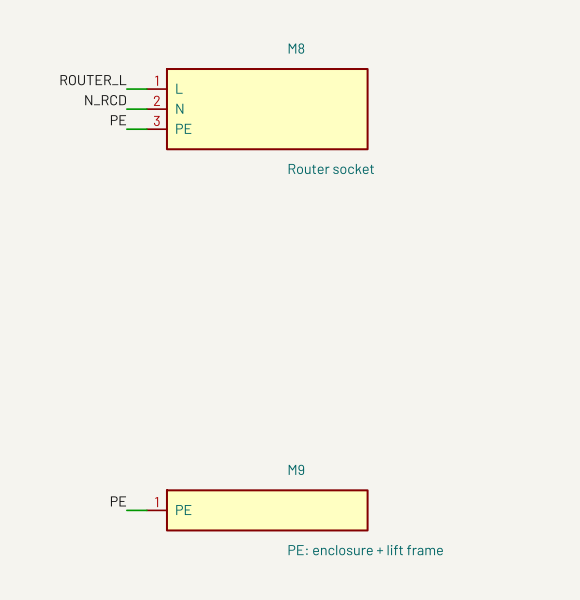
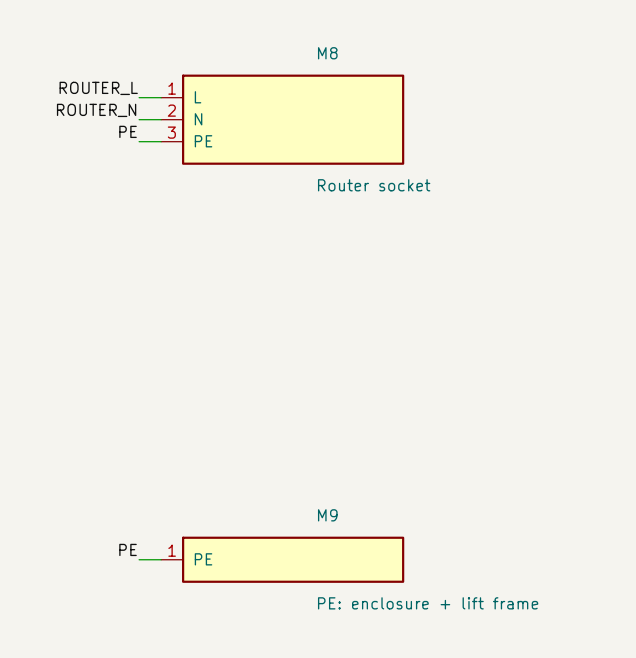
label: N_RCD (105, 100) -> ROUTER_N (96, 110)

